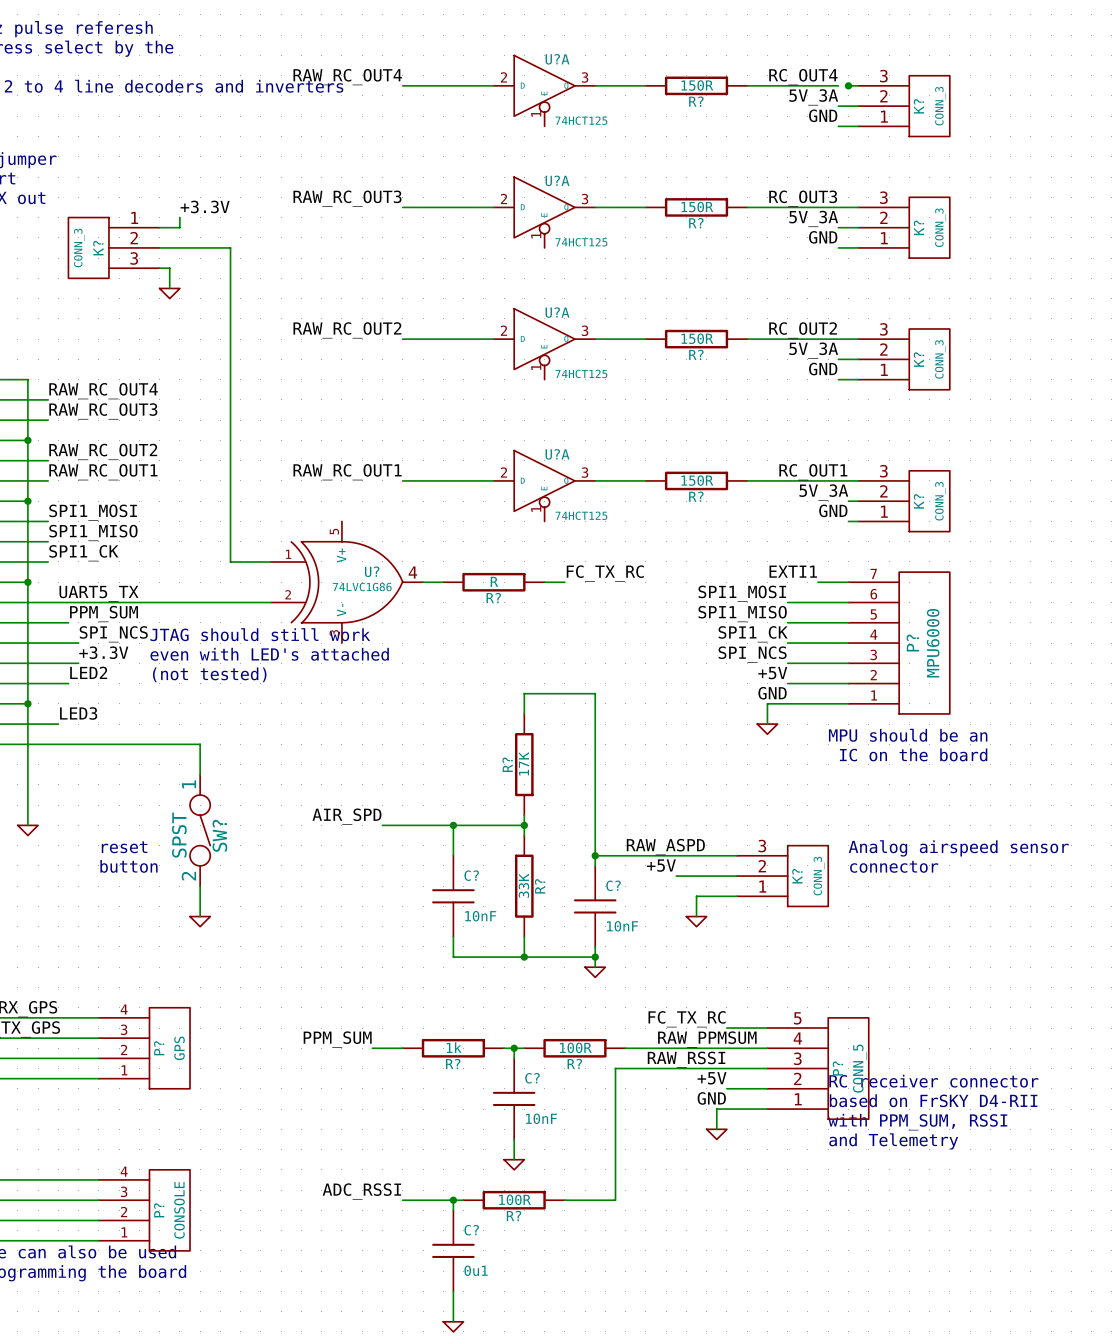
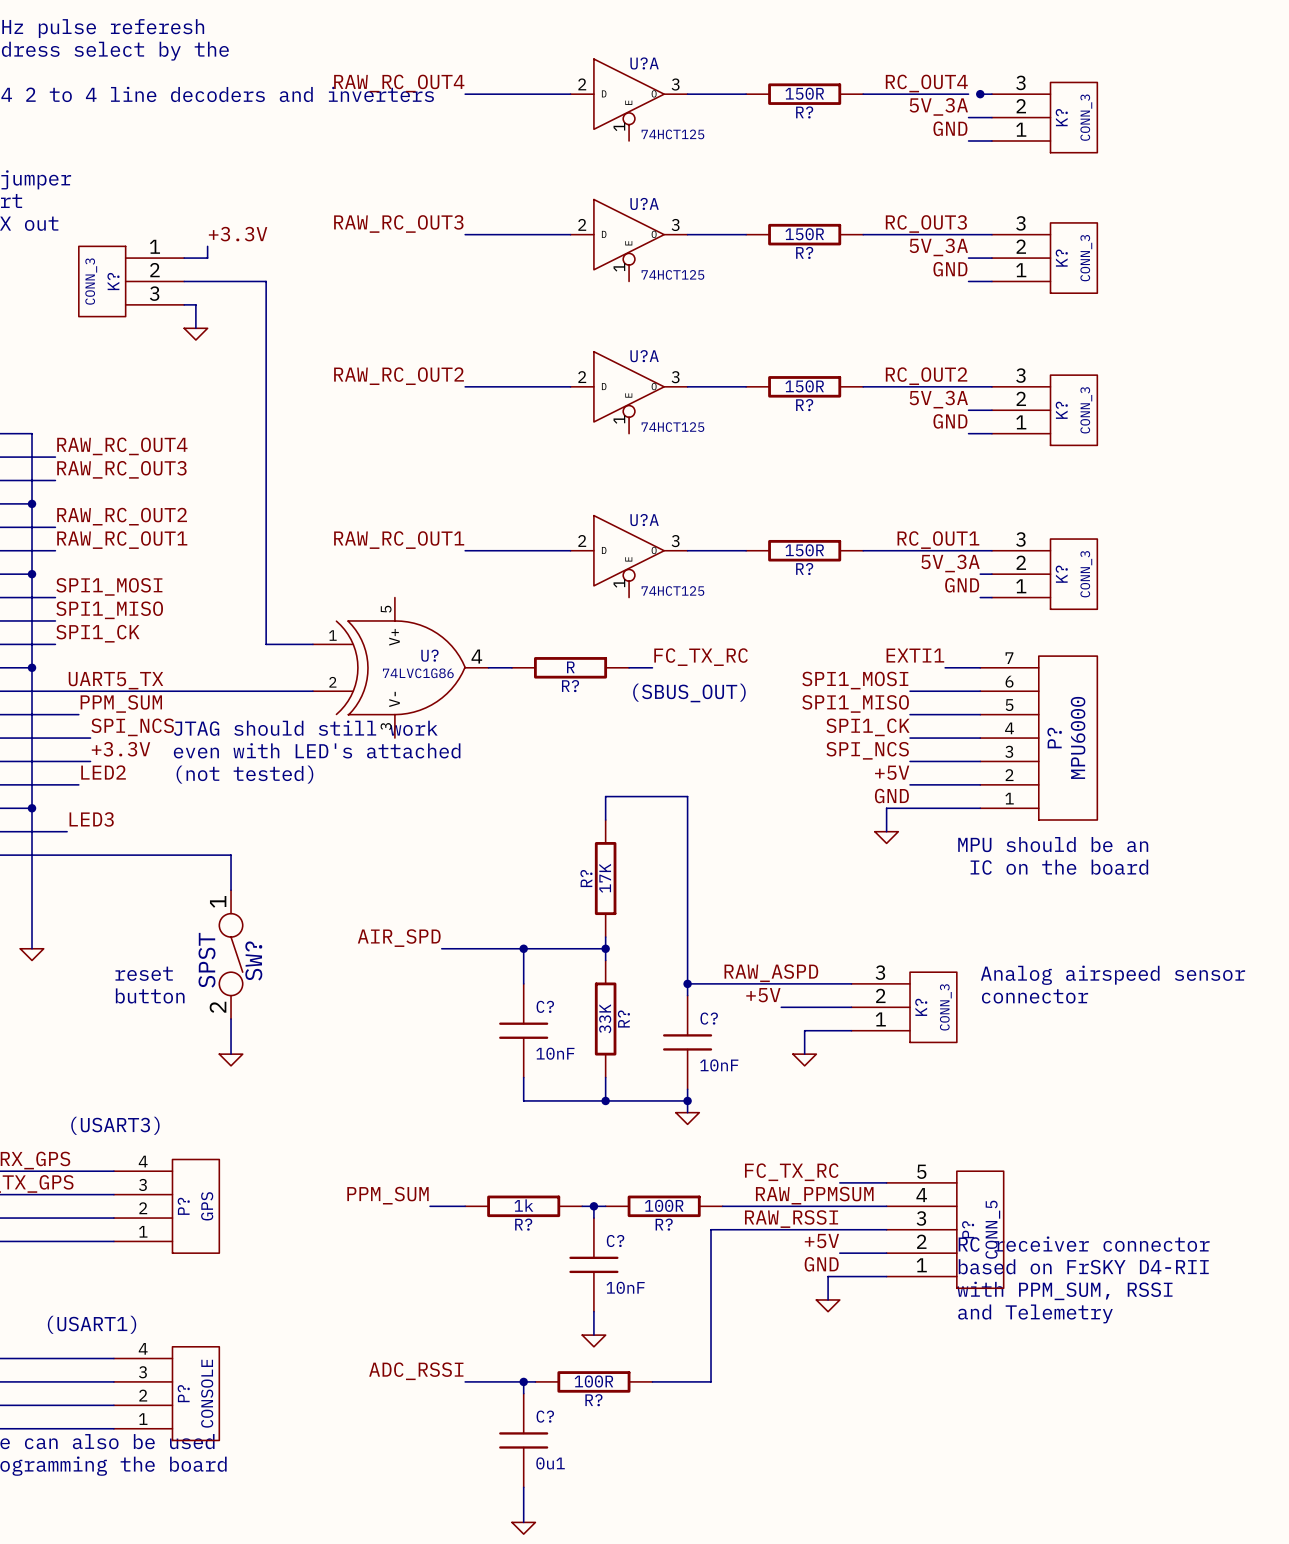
text: none -> (SBUS_OUT) (689, 692)
text: none -> (USART3) (115, 1125)
text: none -> (USART1) (92, 1324)

